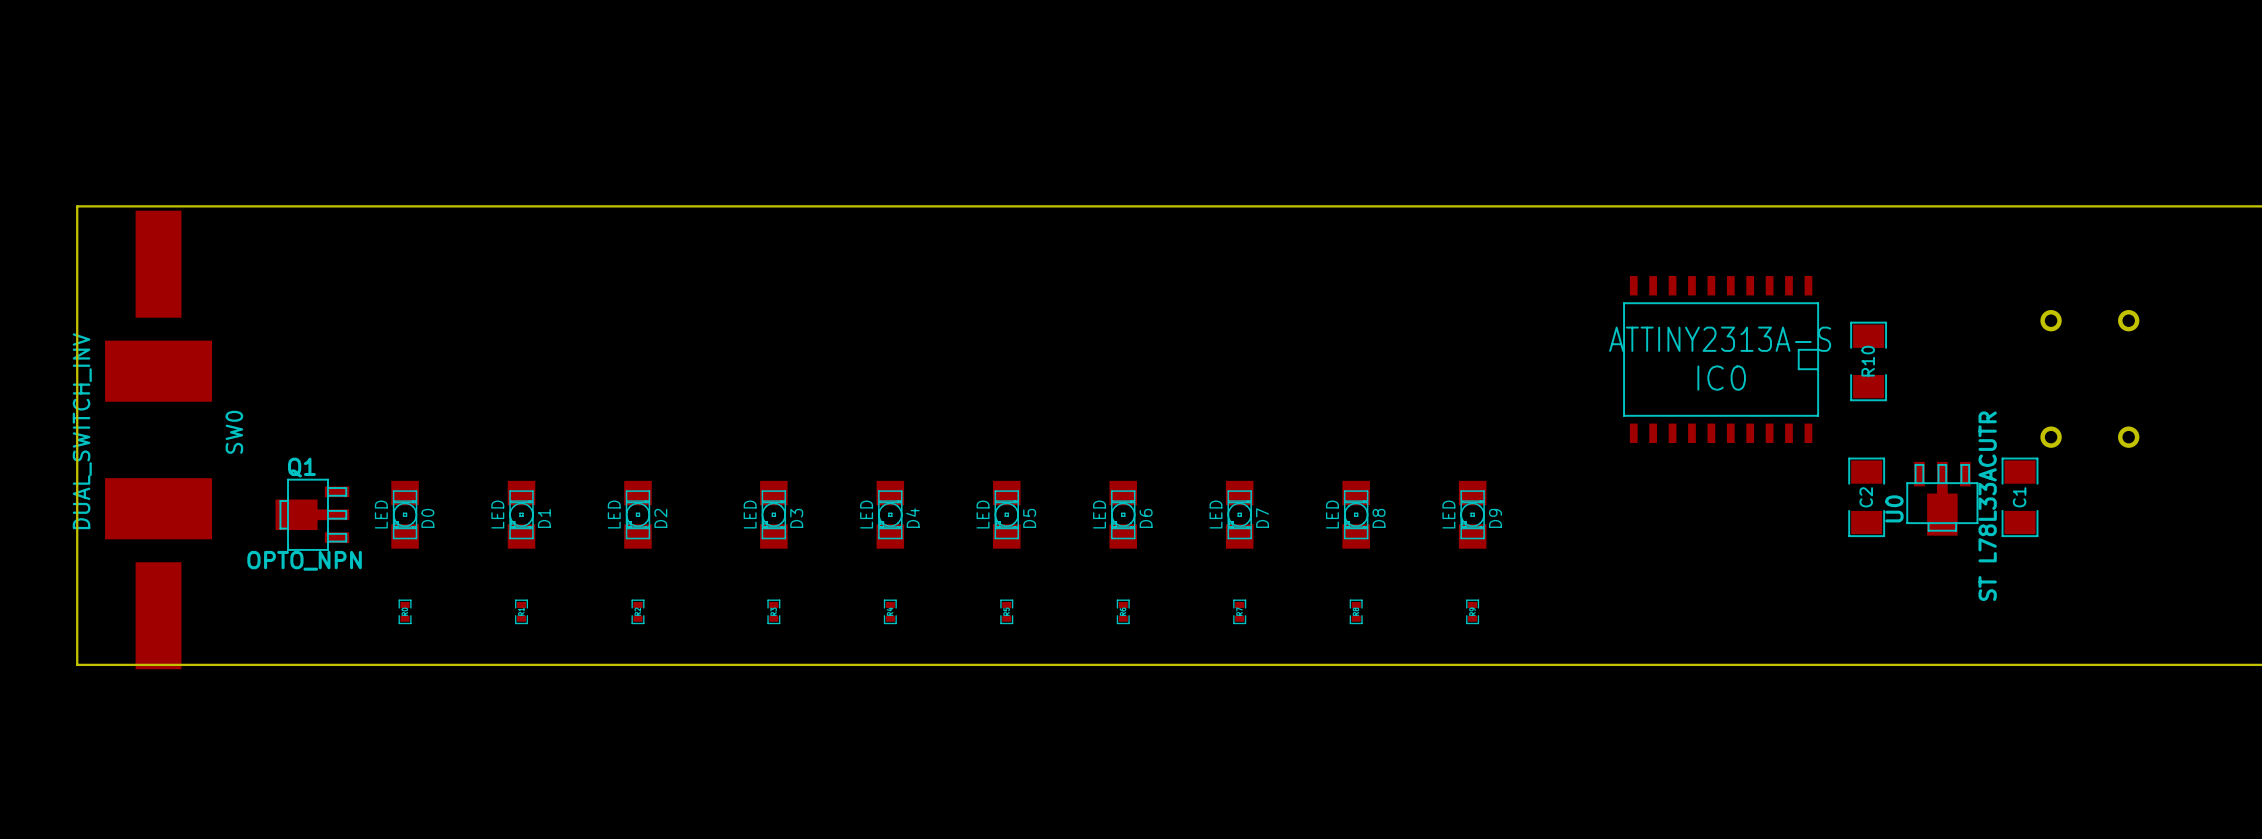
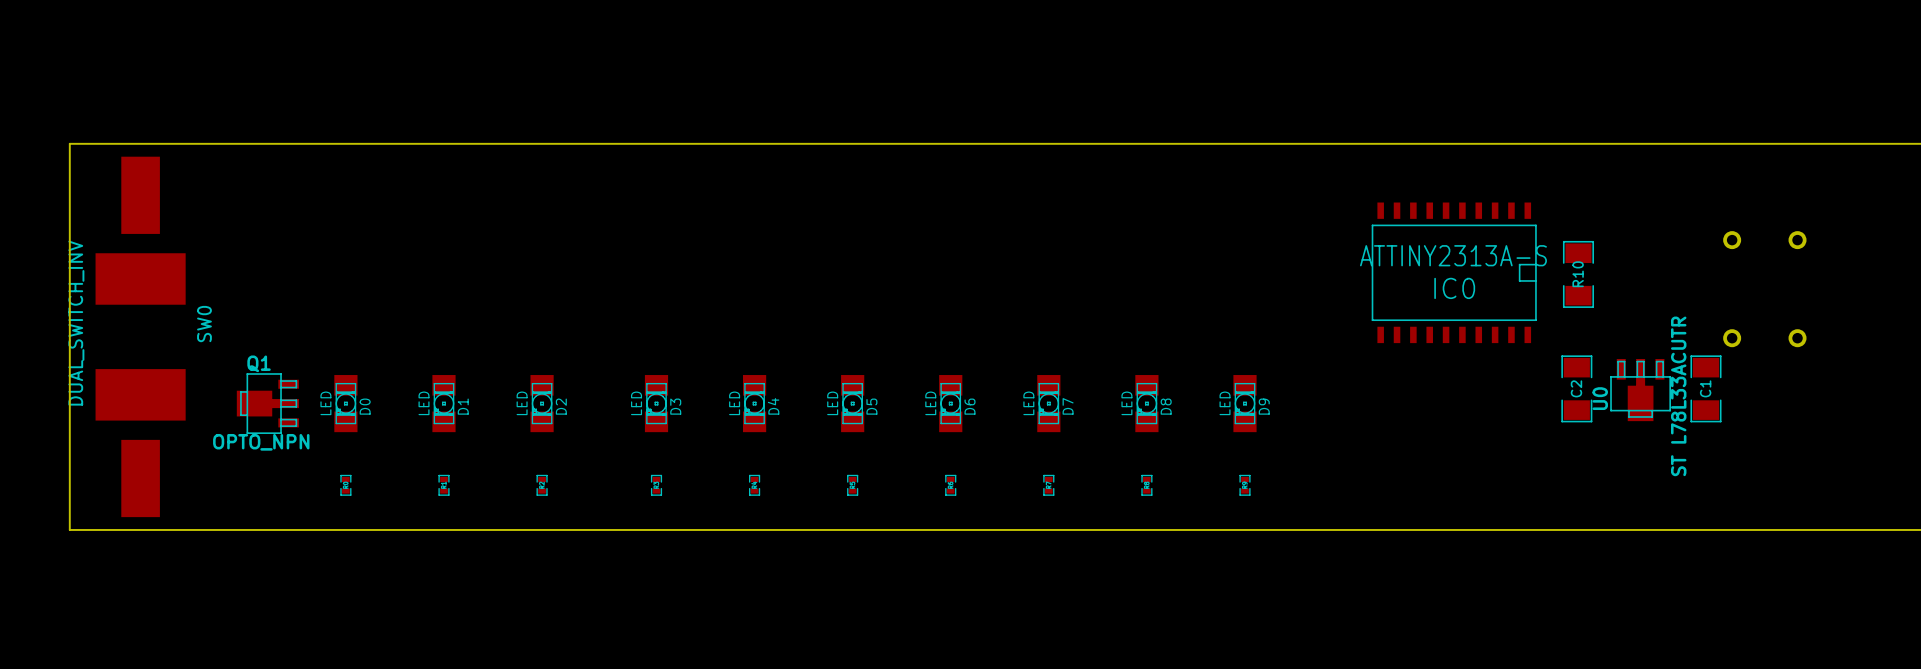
SW0 footprint: [105, 210, 213, 670] -> [95, 156, 186, 518]

